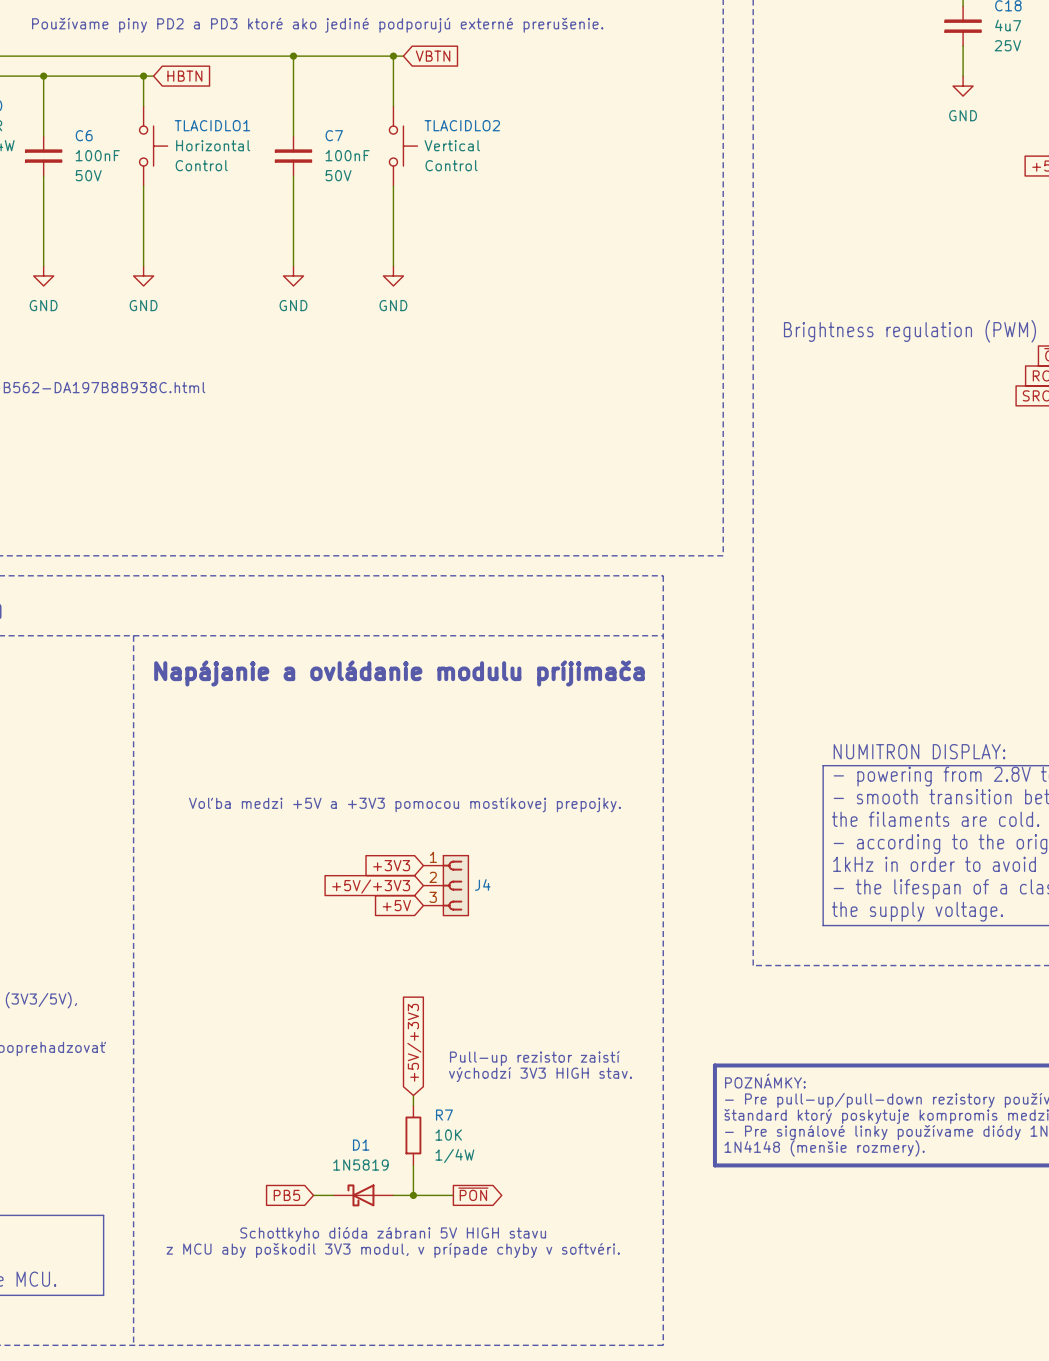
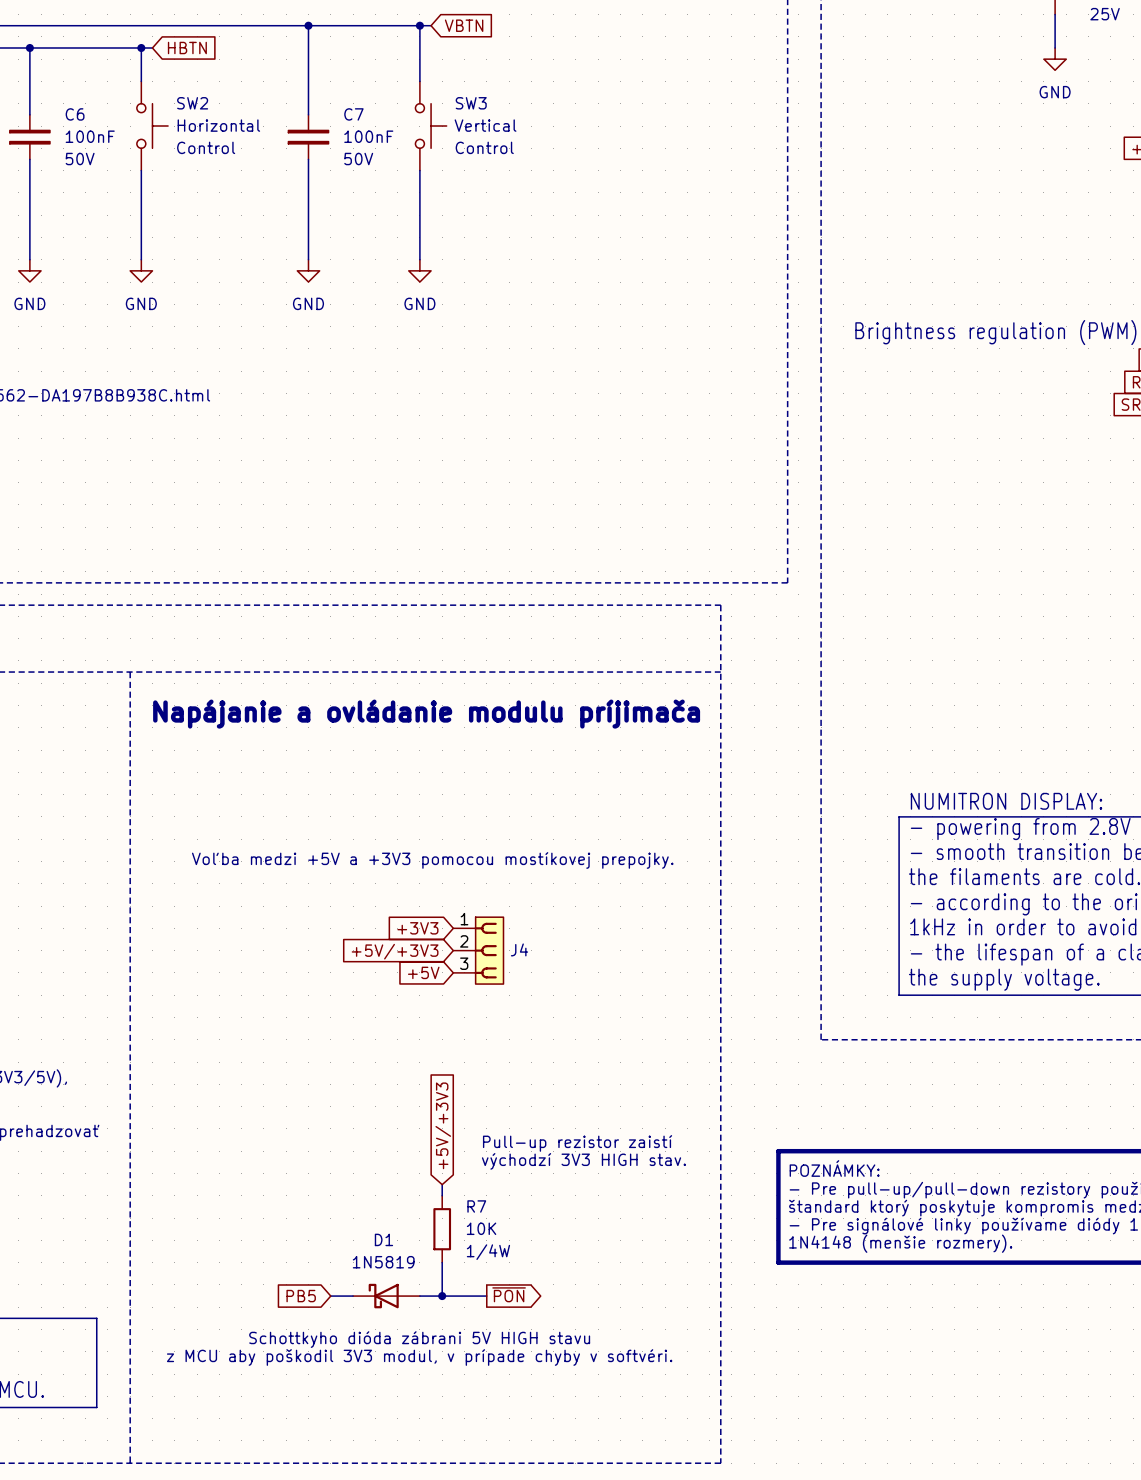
TLACIDLO1 name: TLACIDLO1 (212, 125) -> SW2 (192, 103)
TLACIDLO2 name: TLACIDLO2 (462, 125) -> SW3 (471, 103)

